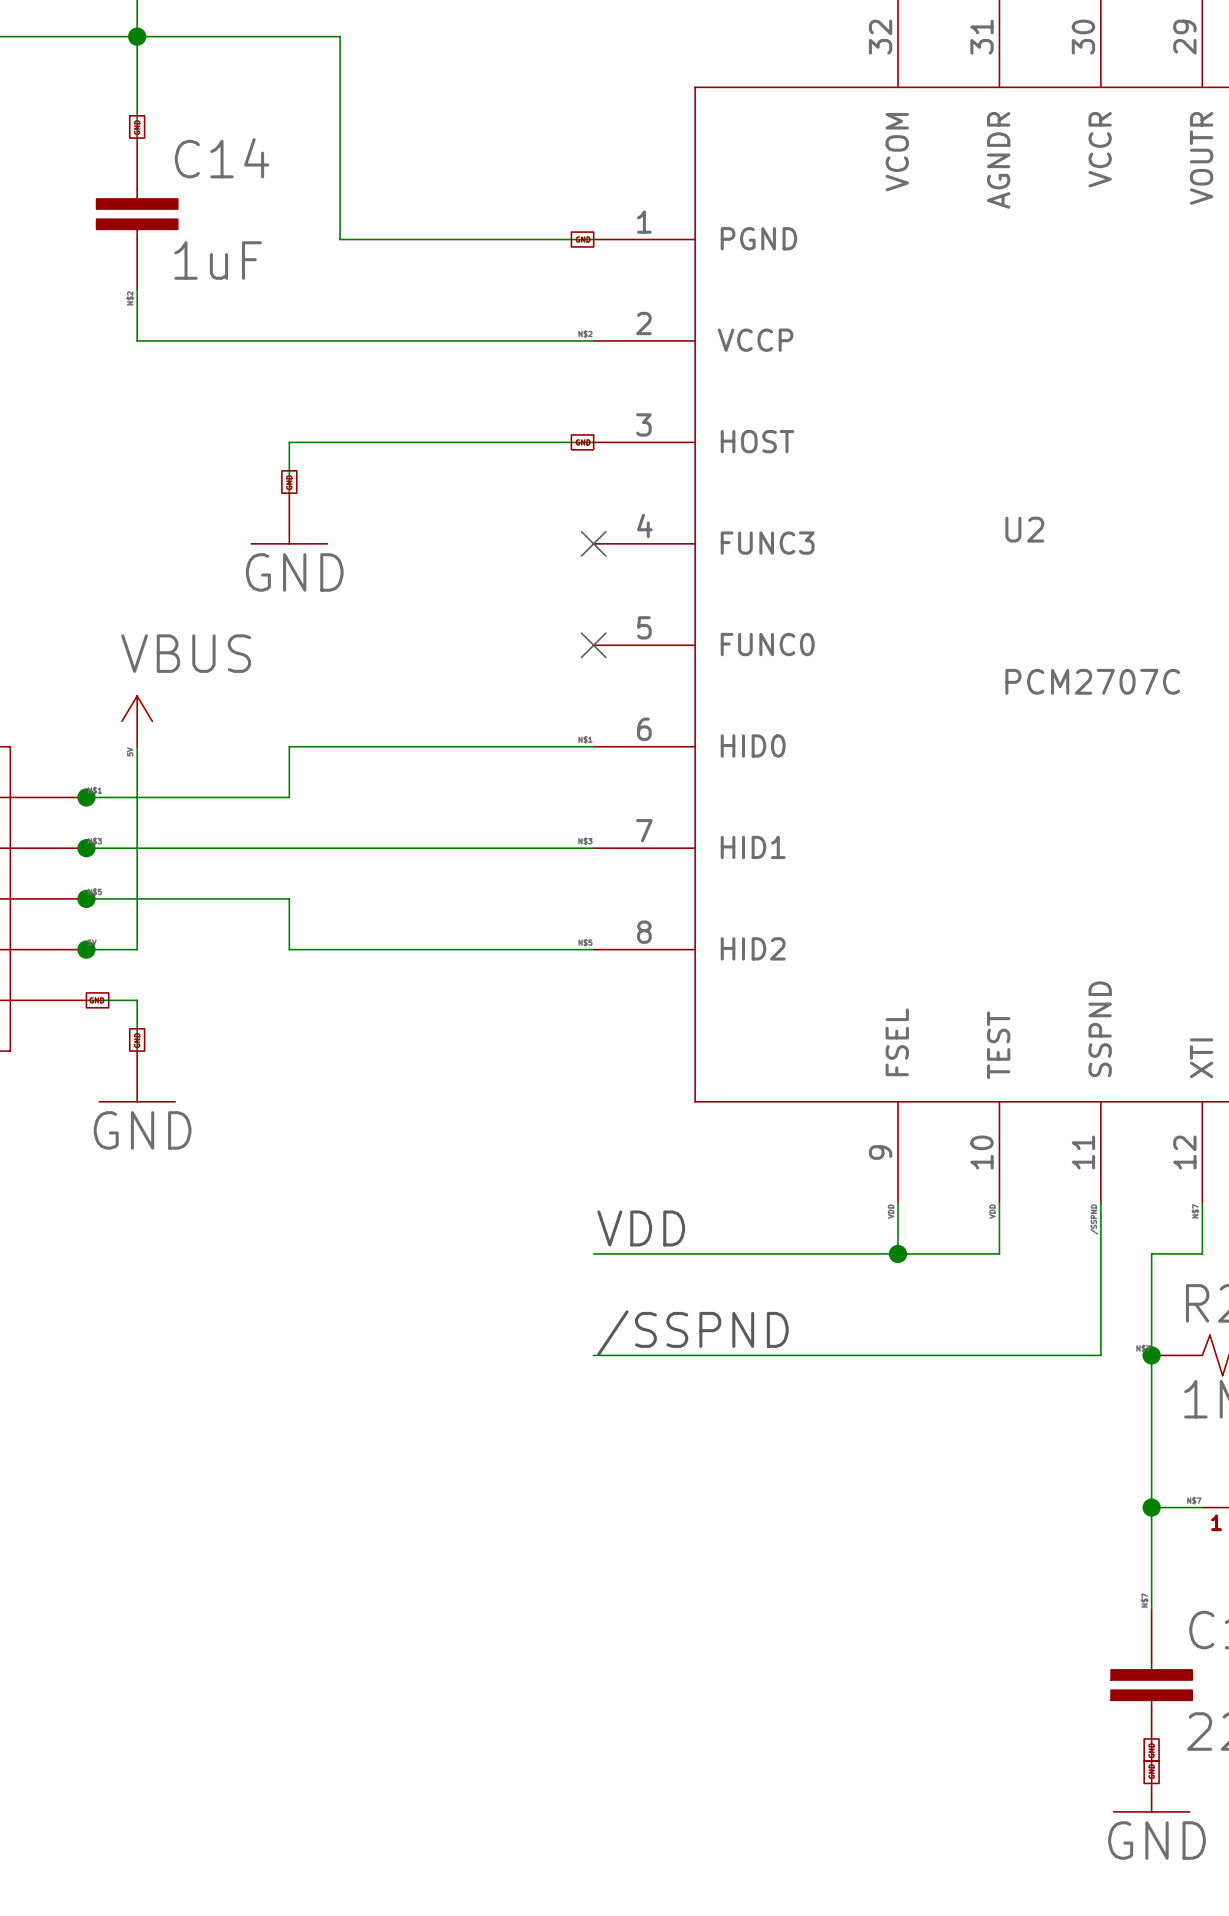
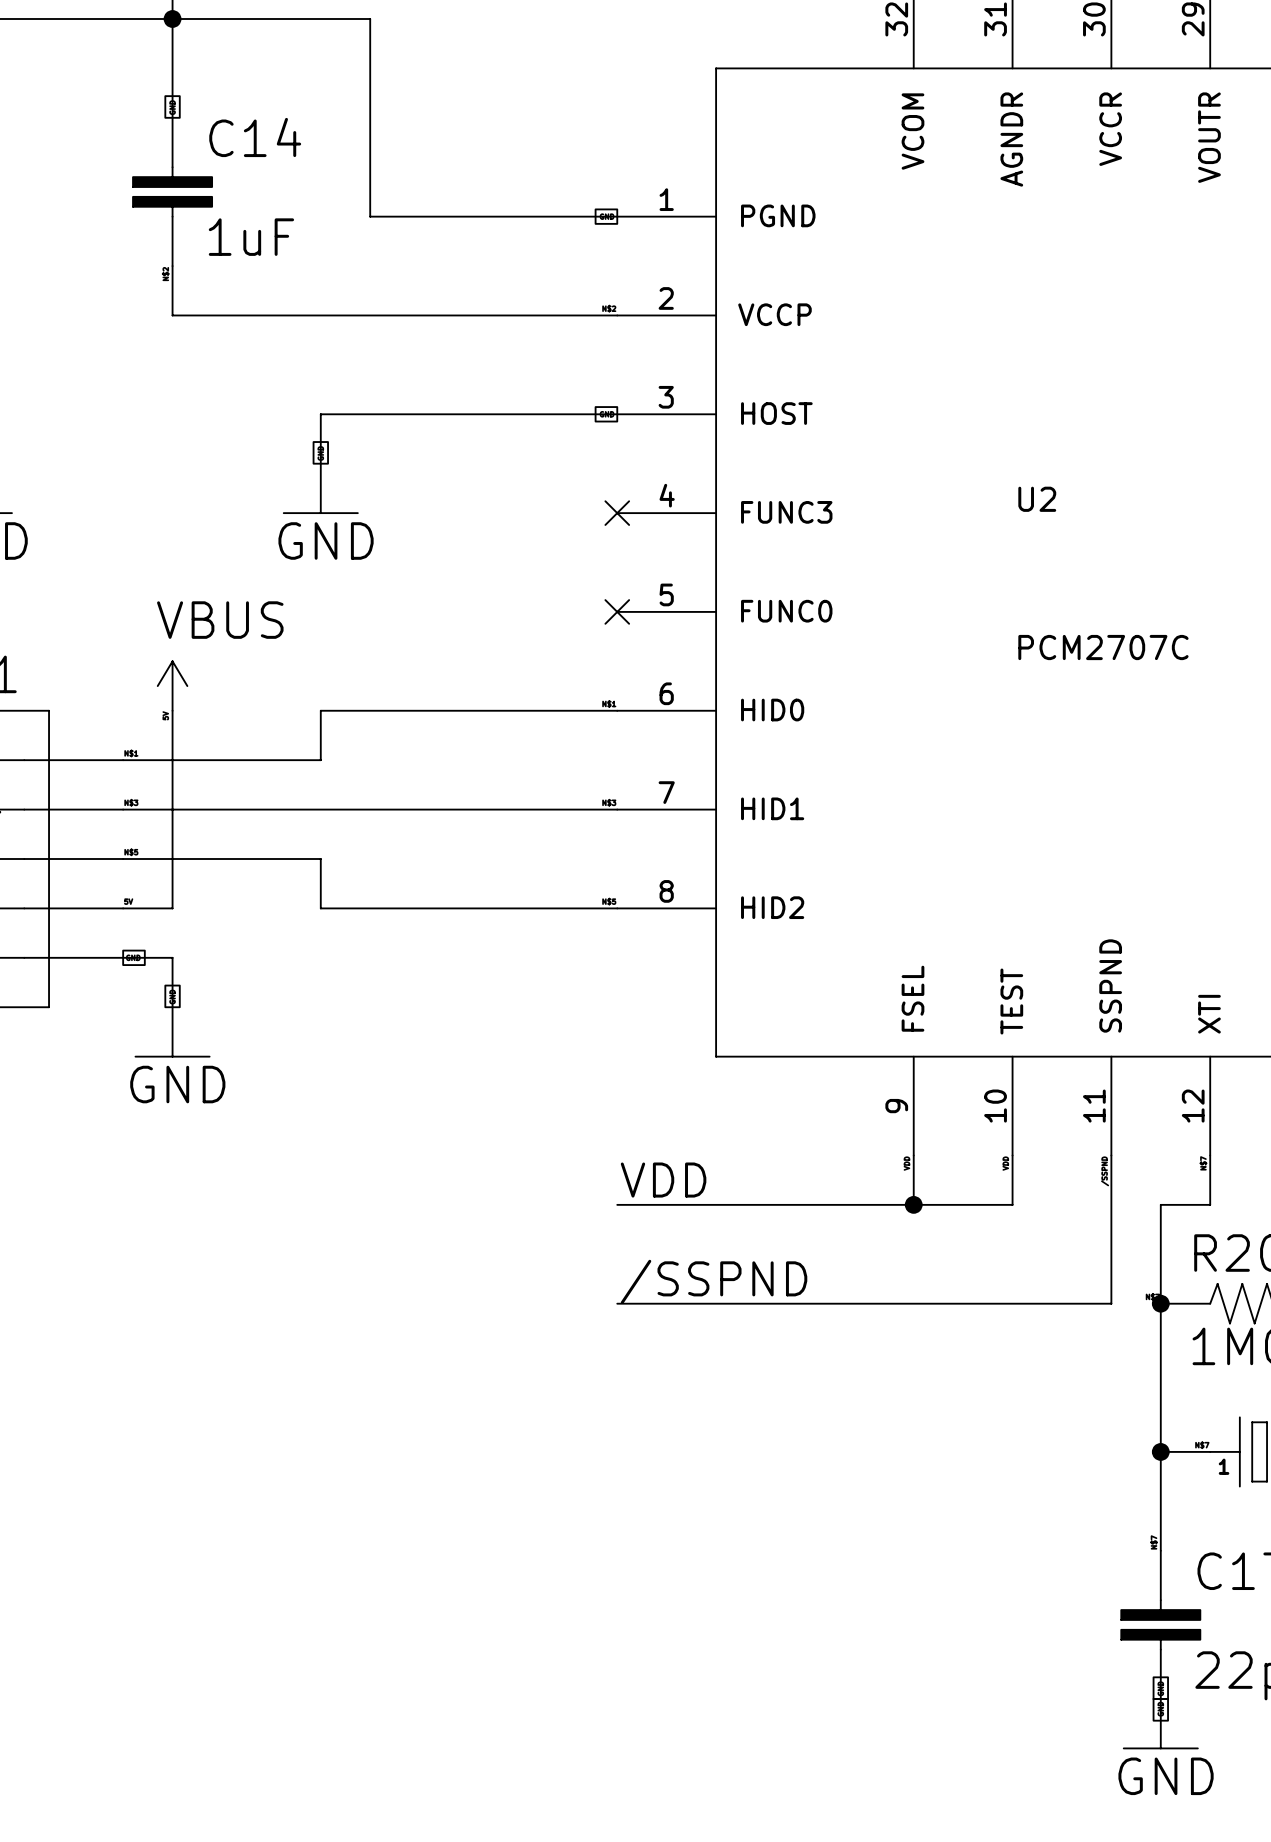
junction: (86, 797) -> none
junction: (86, 848) -> none
junction: (86, 898) -> none
junction: (86, 949) -> none

